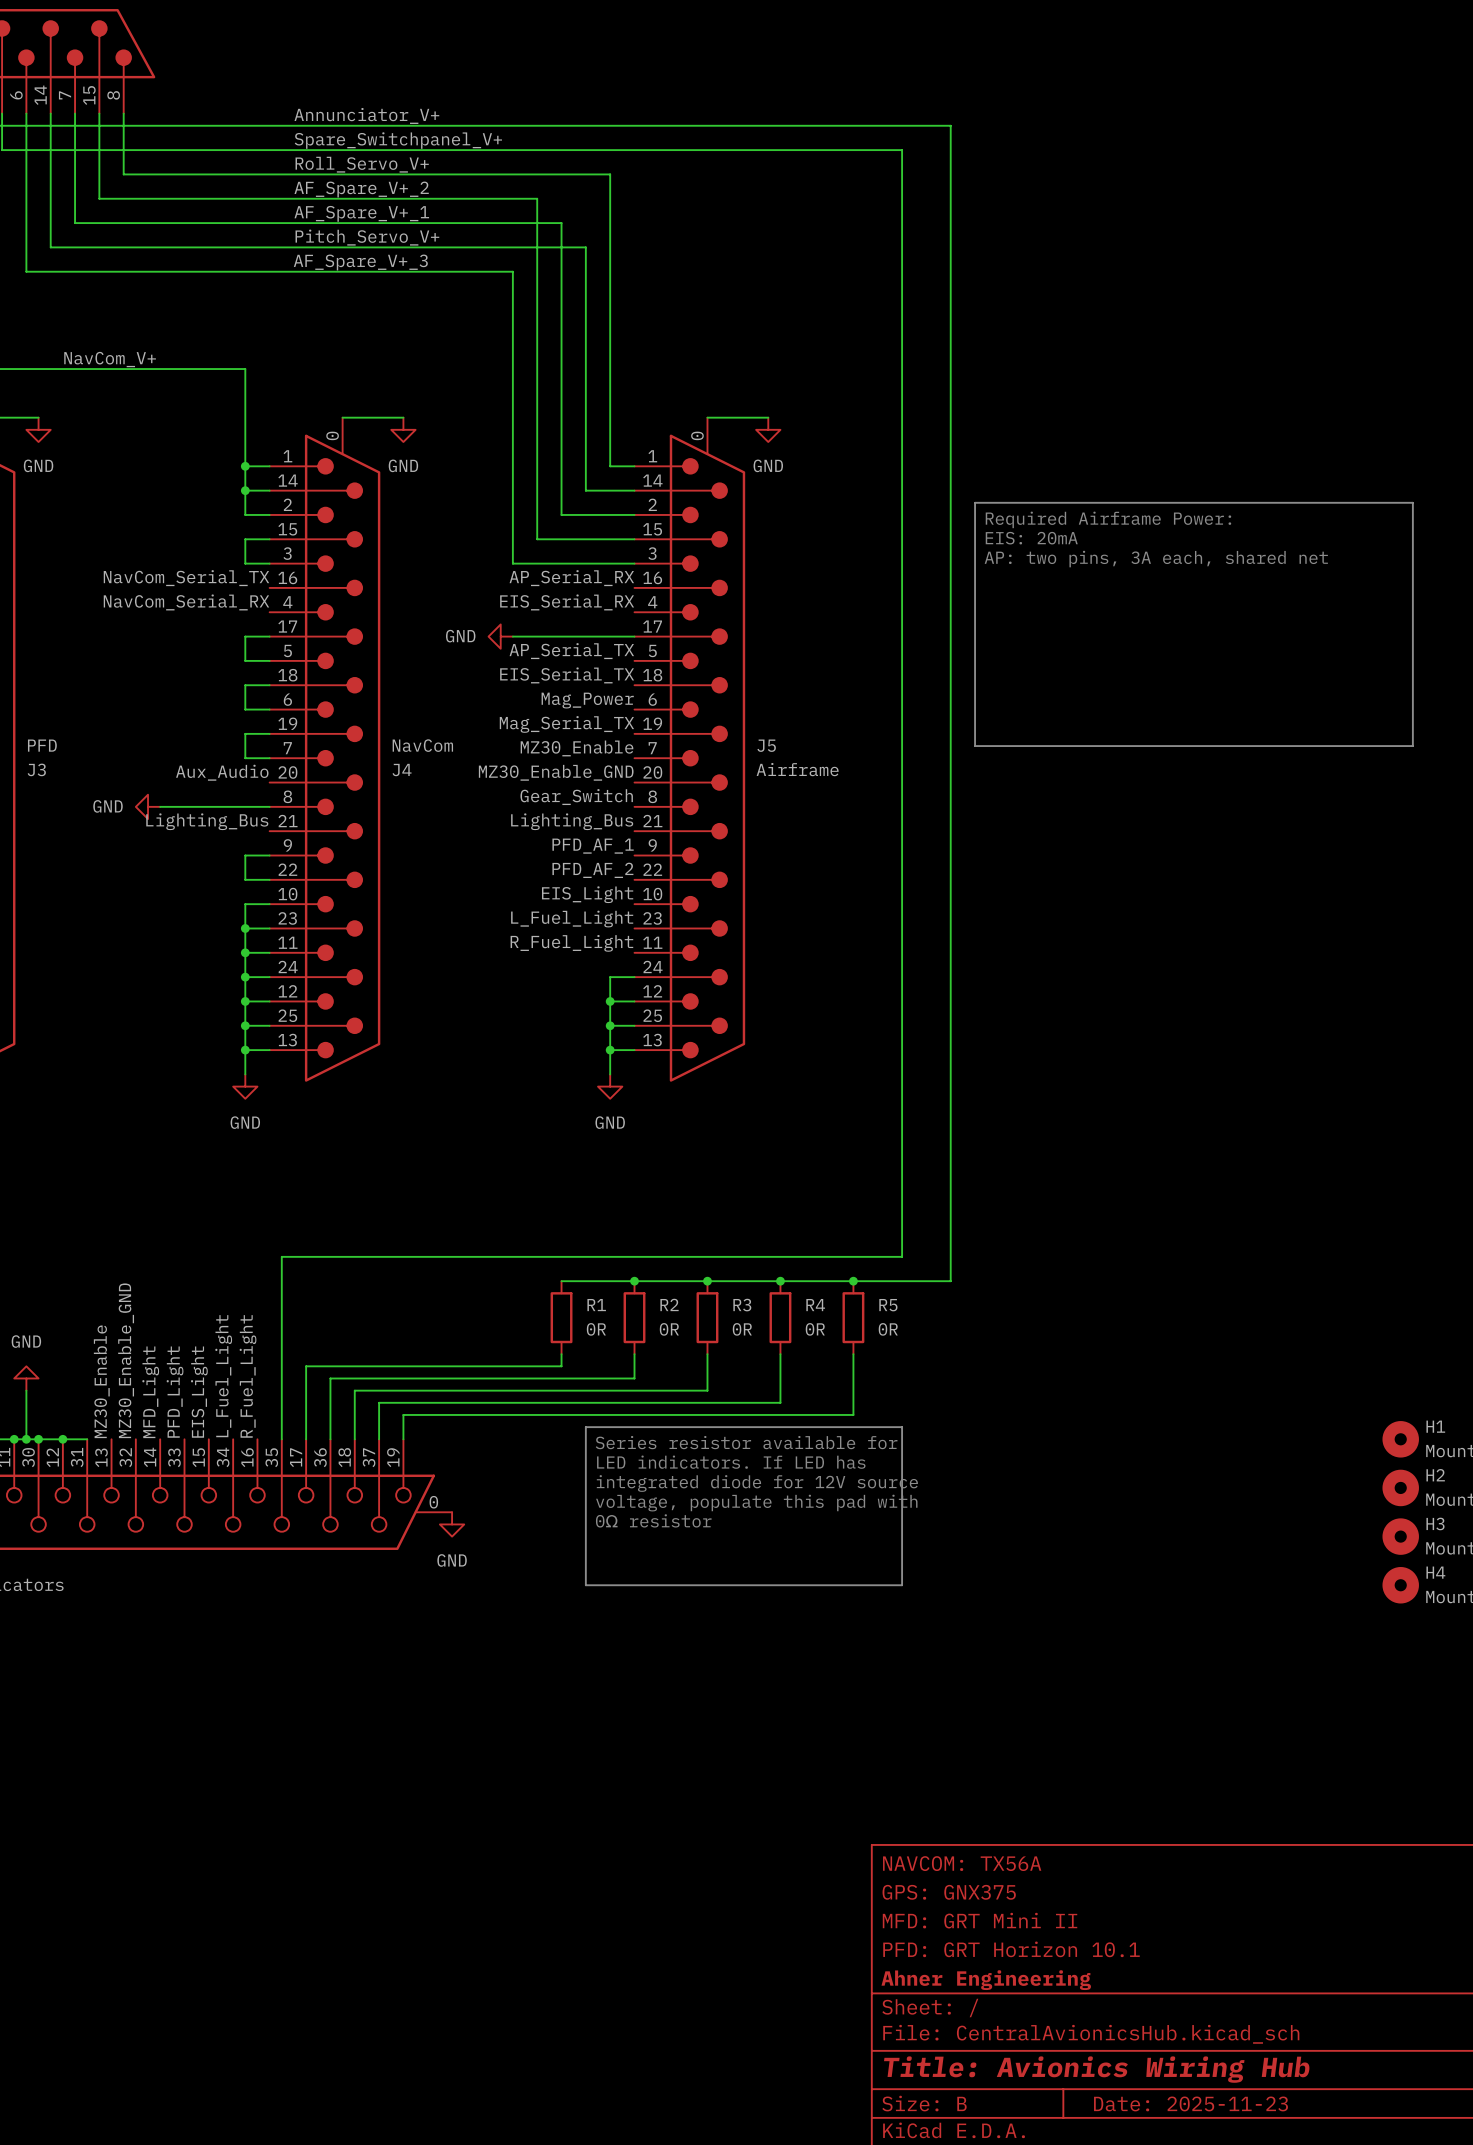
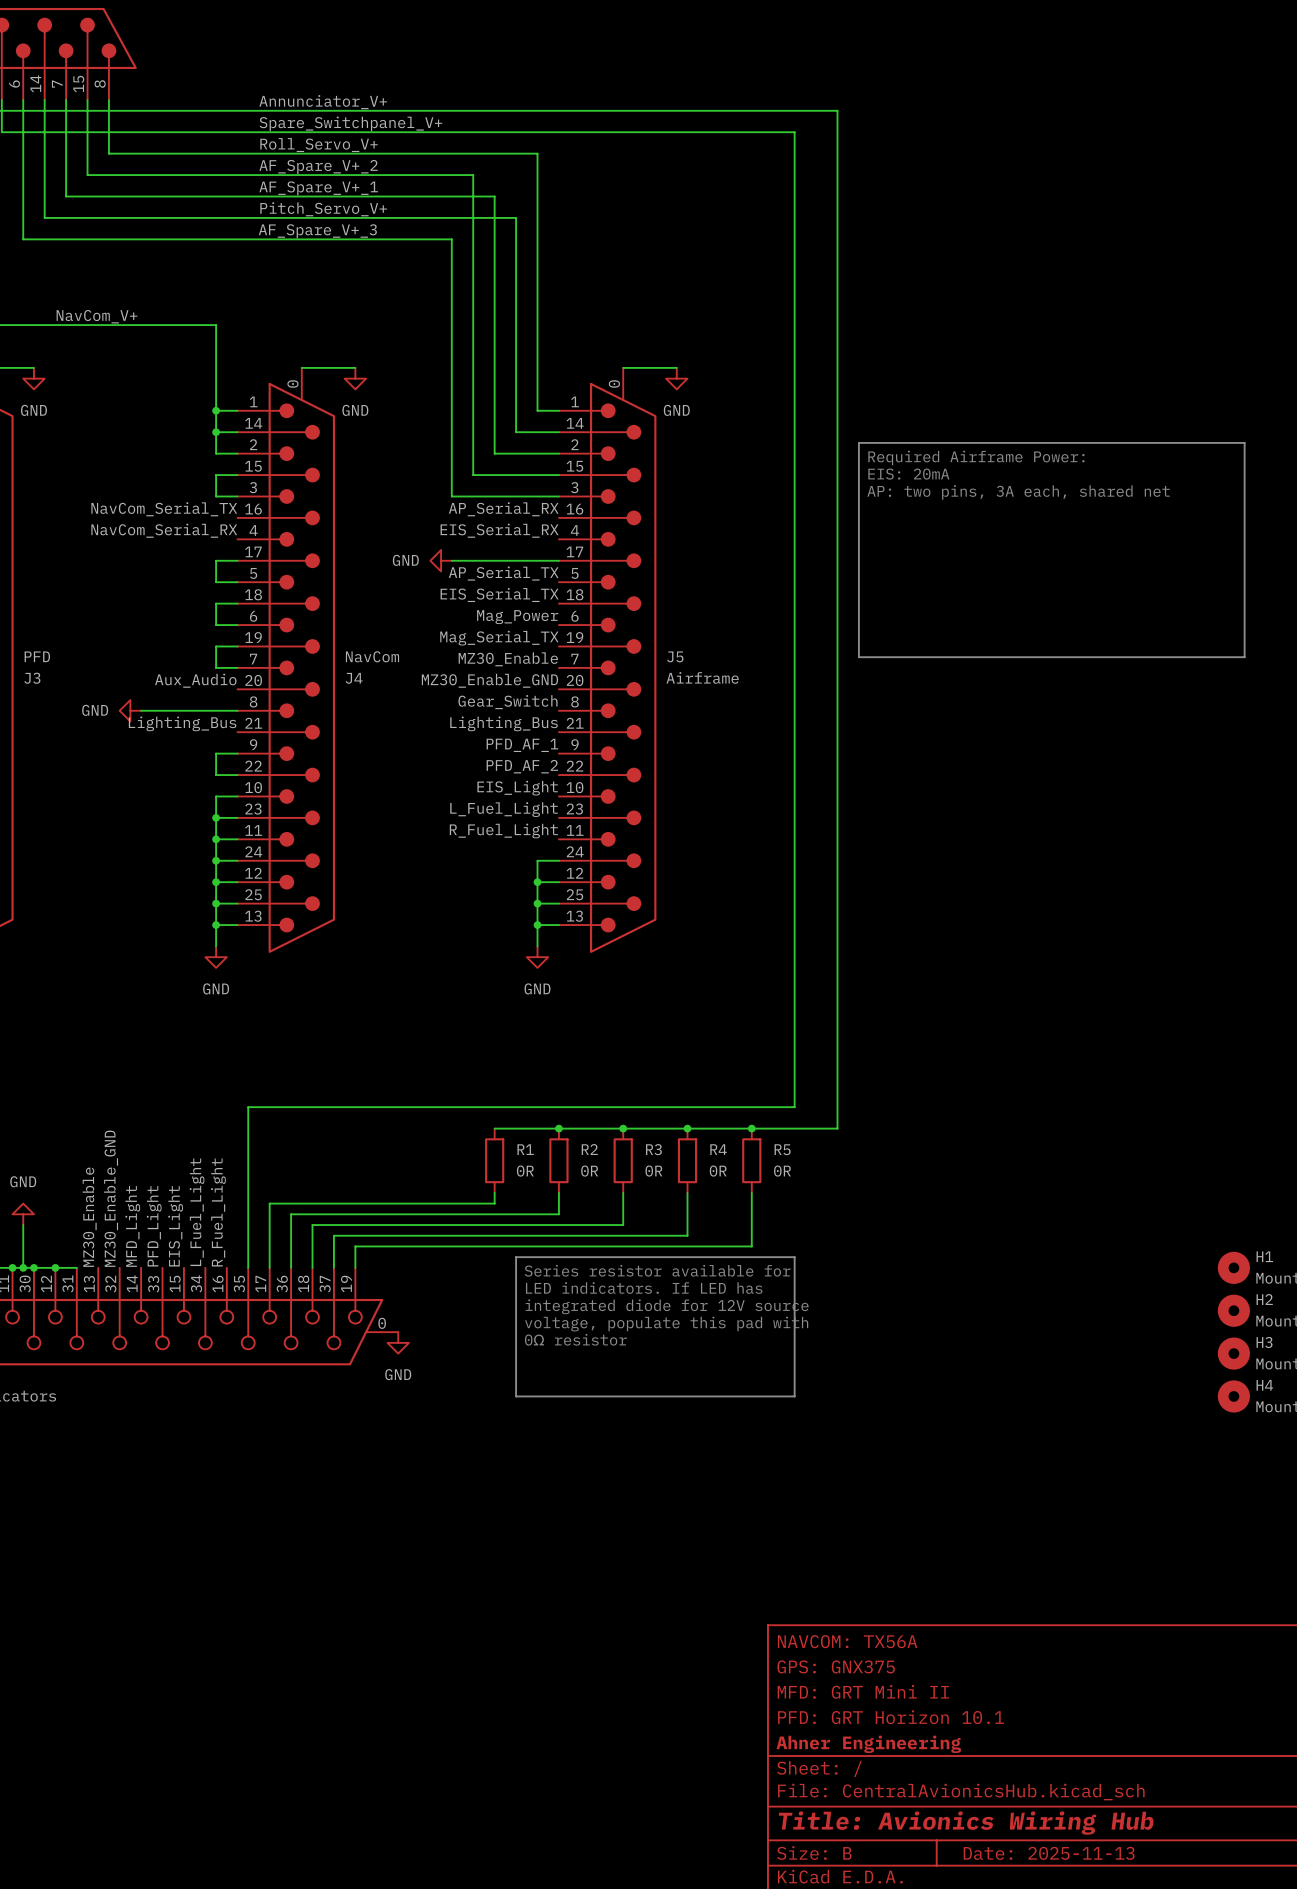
title block: Date: 2025-11-23 (1191, 2103) -> Date: 2025-11-13 (1049, 1853)

